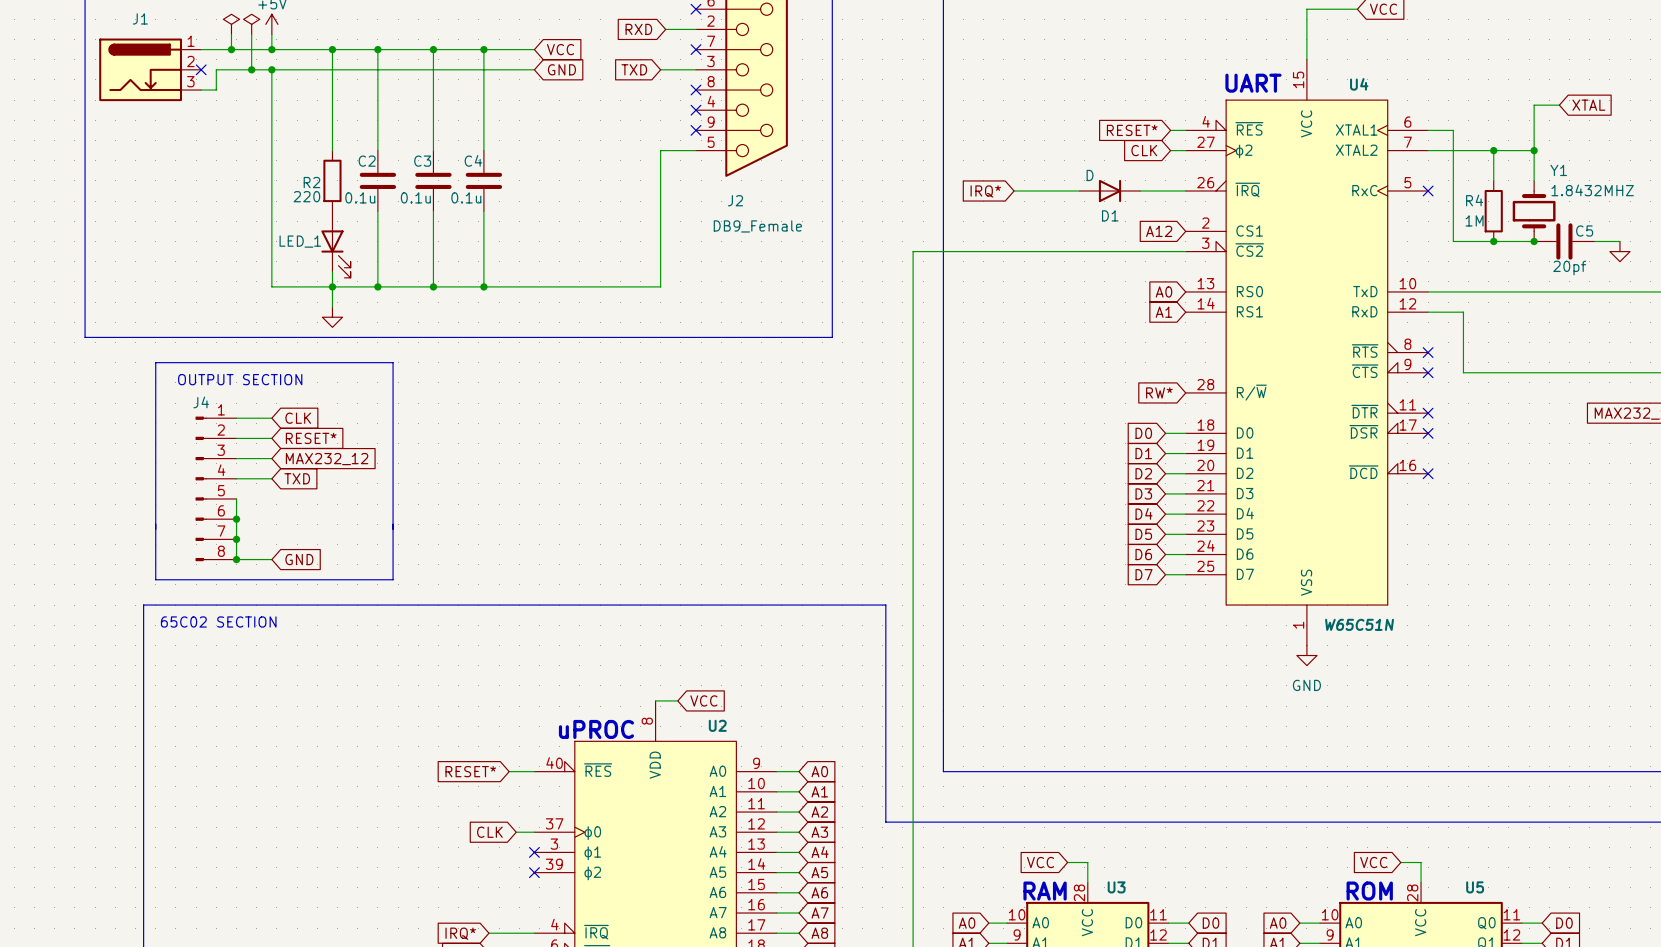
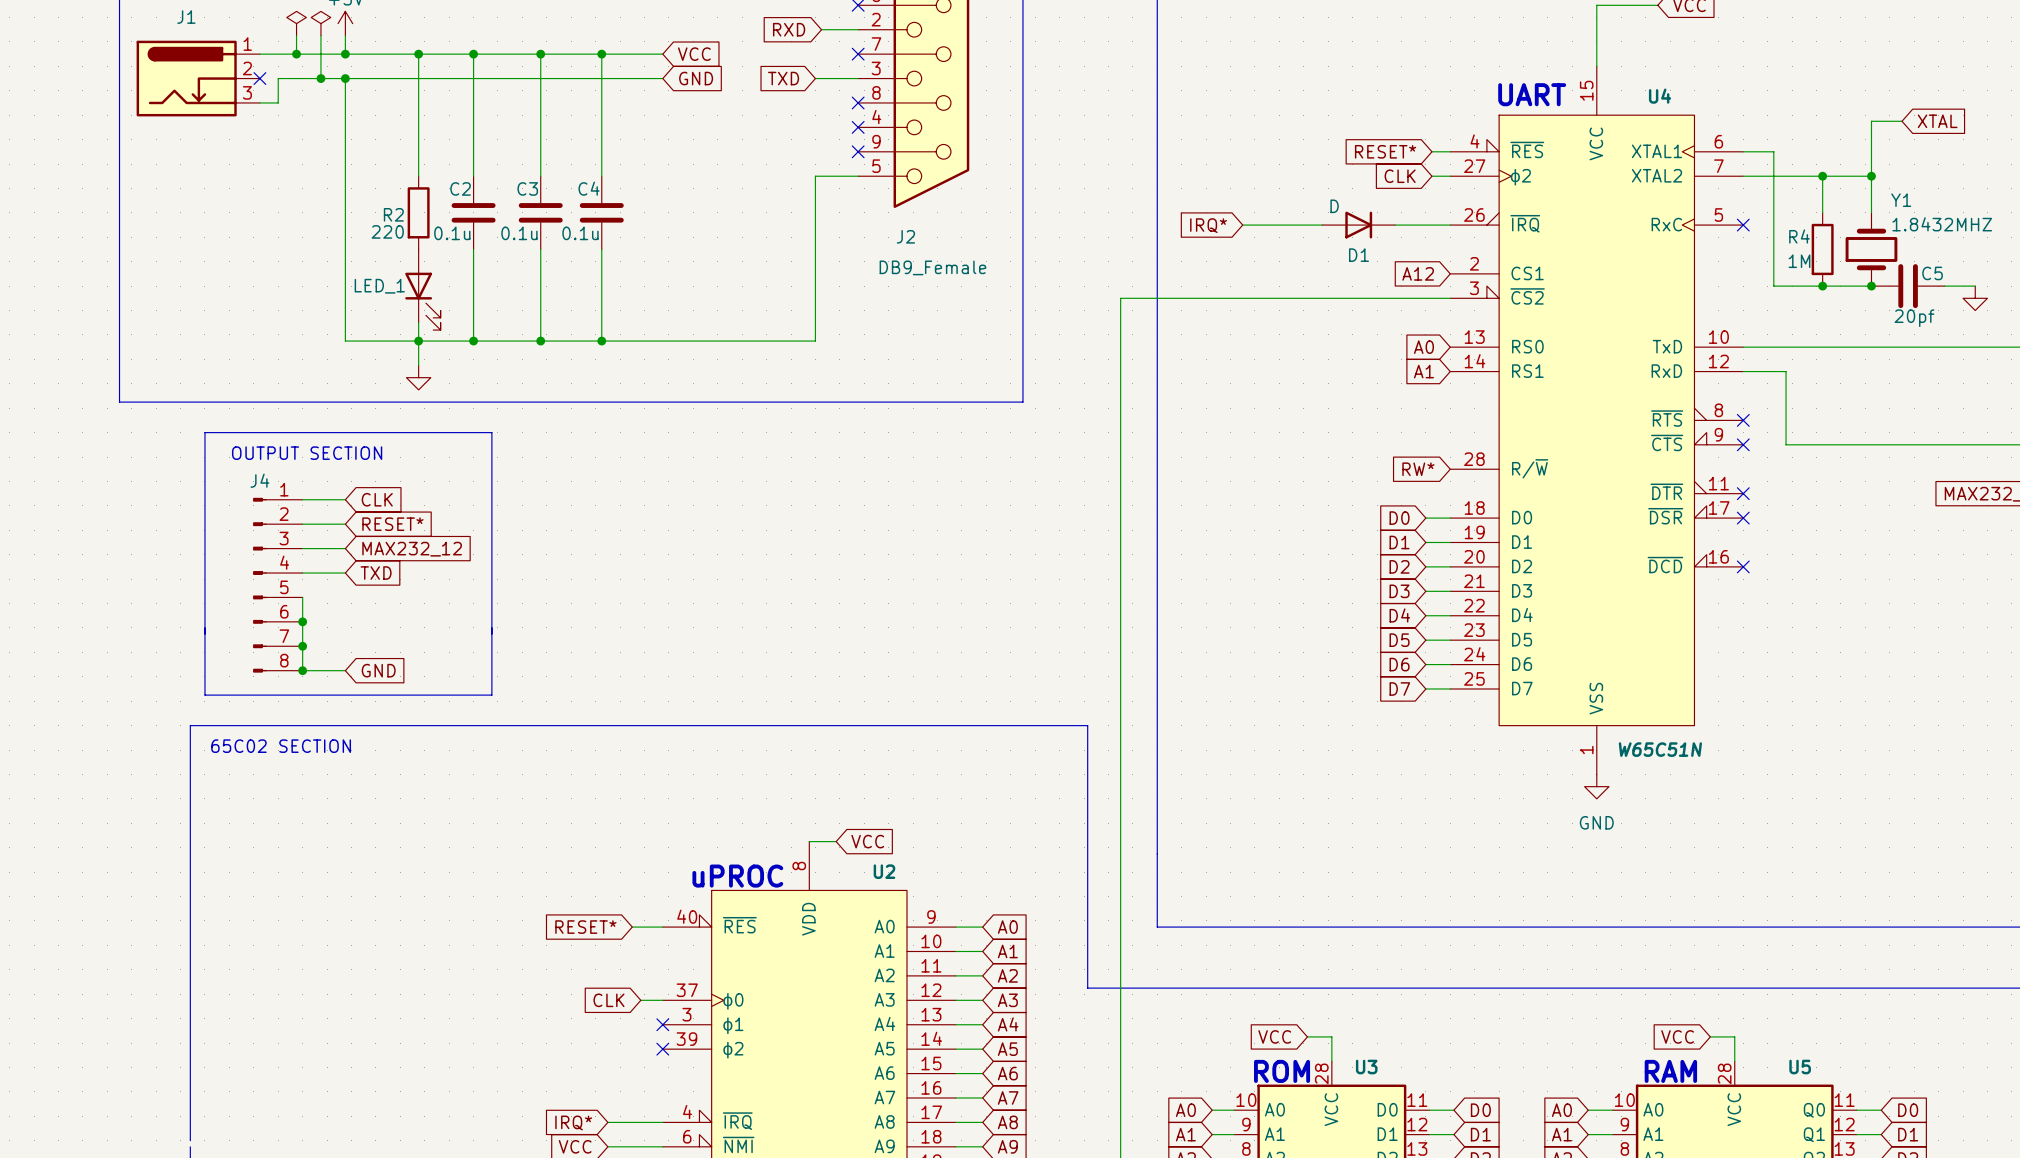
text: RAM (1045, 891) -> ROM (1282, 1071)
text: ROM (1369, 891) -> RAM (1670, 1071)

